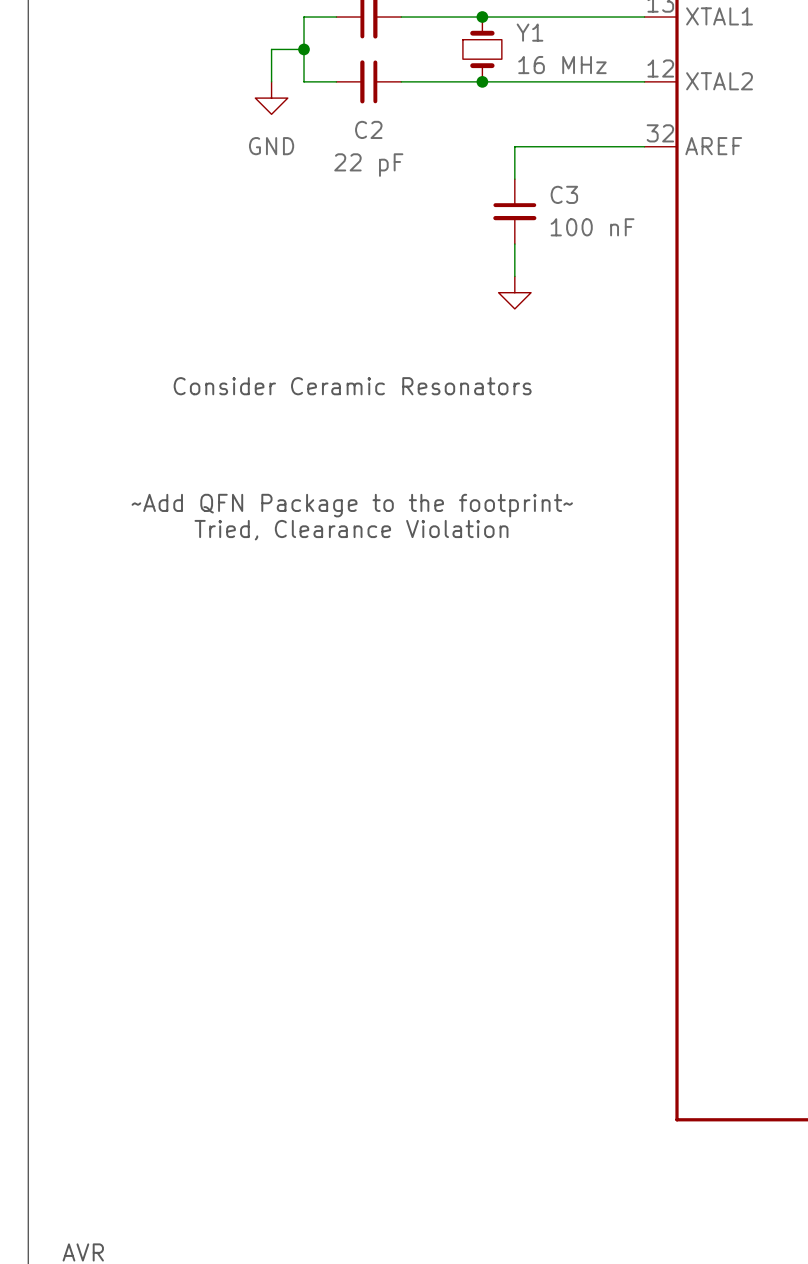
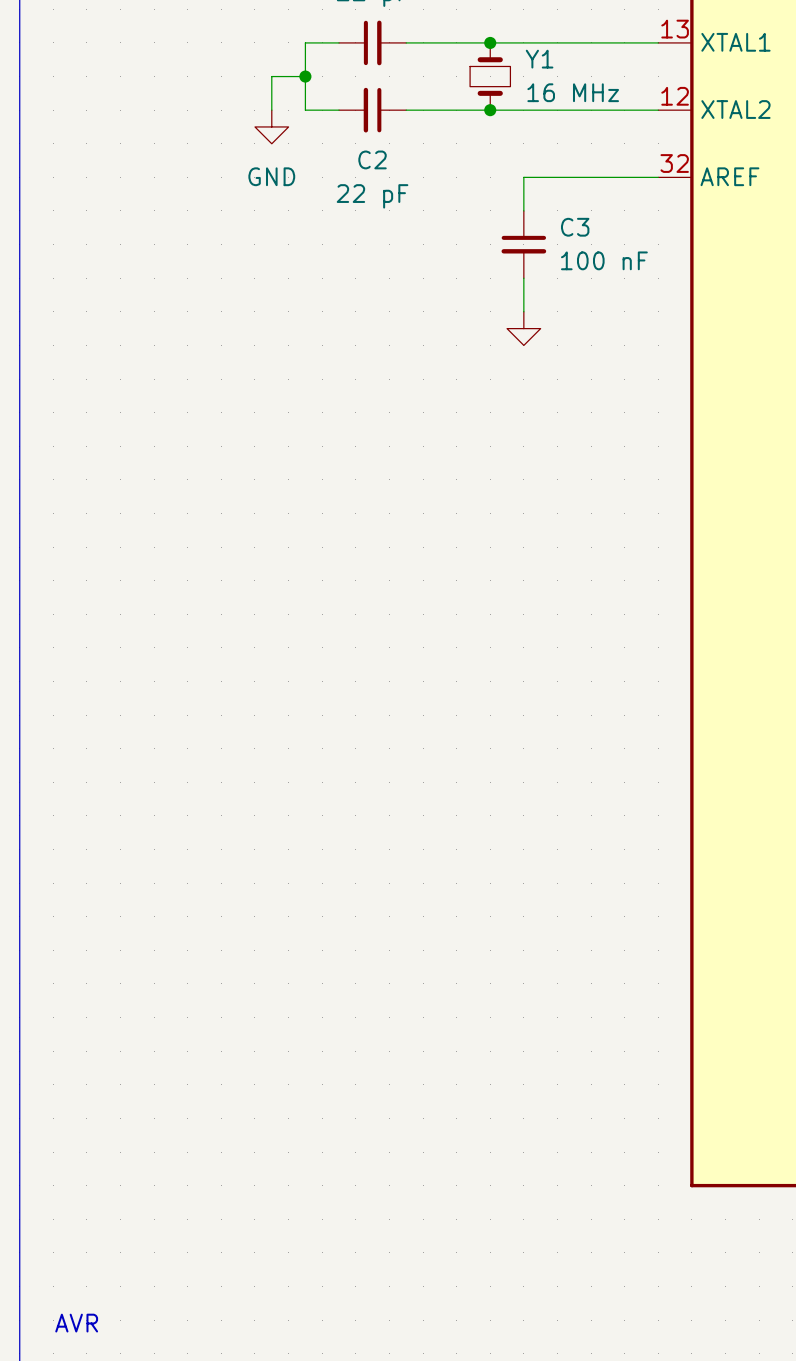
text: Consider Ceramic Resonators (352, 386) -> none
text: ~Add QFN Package to the footprint~ (352, 505) -> none
text: Tried, Clearance Violation (351, 530) -> none

